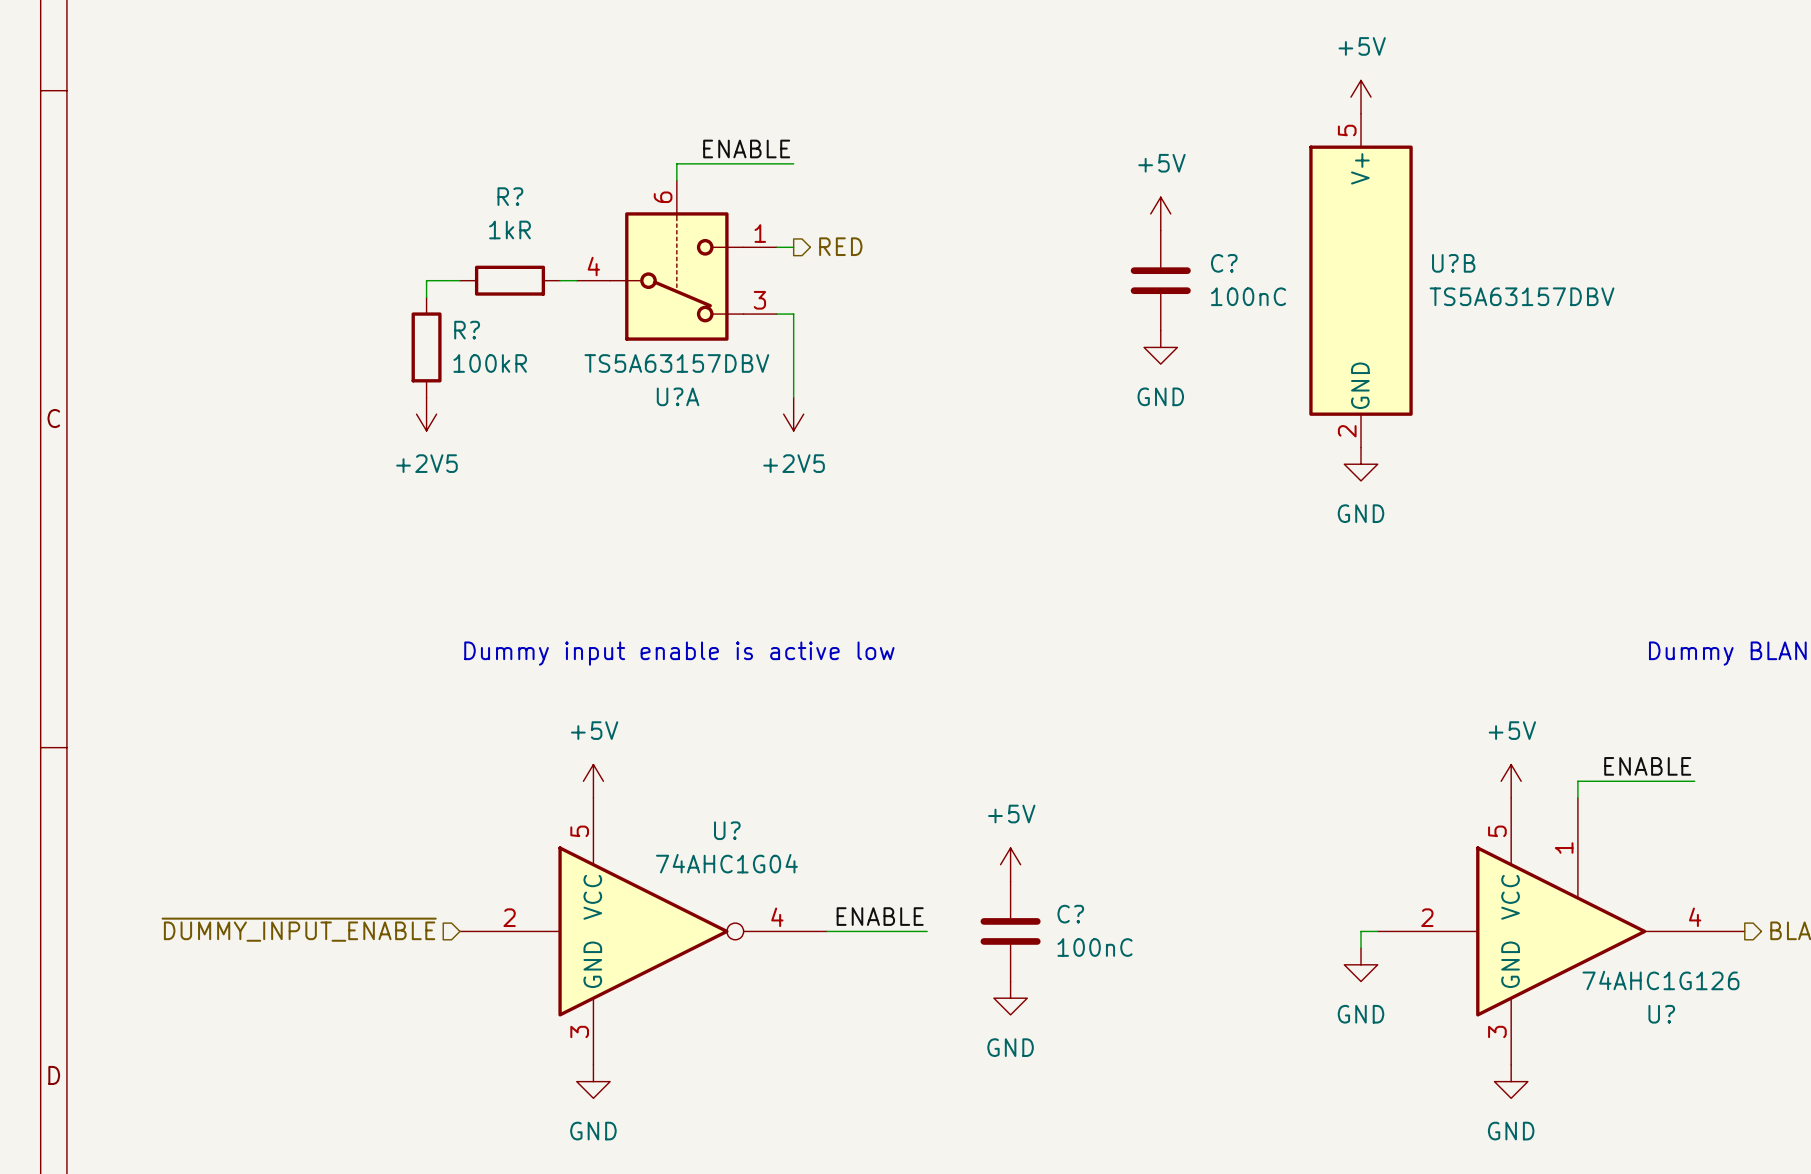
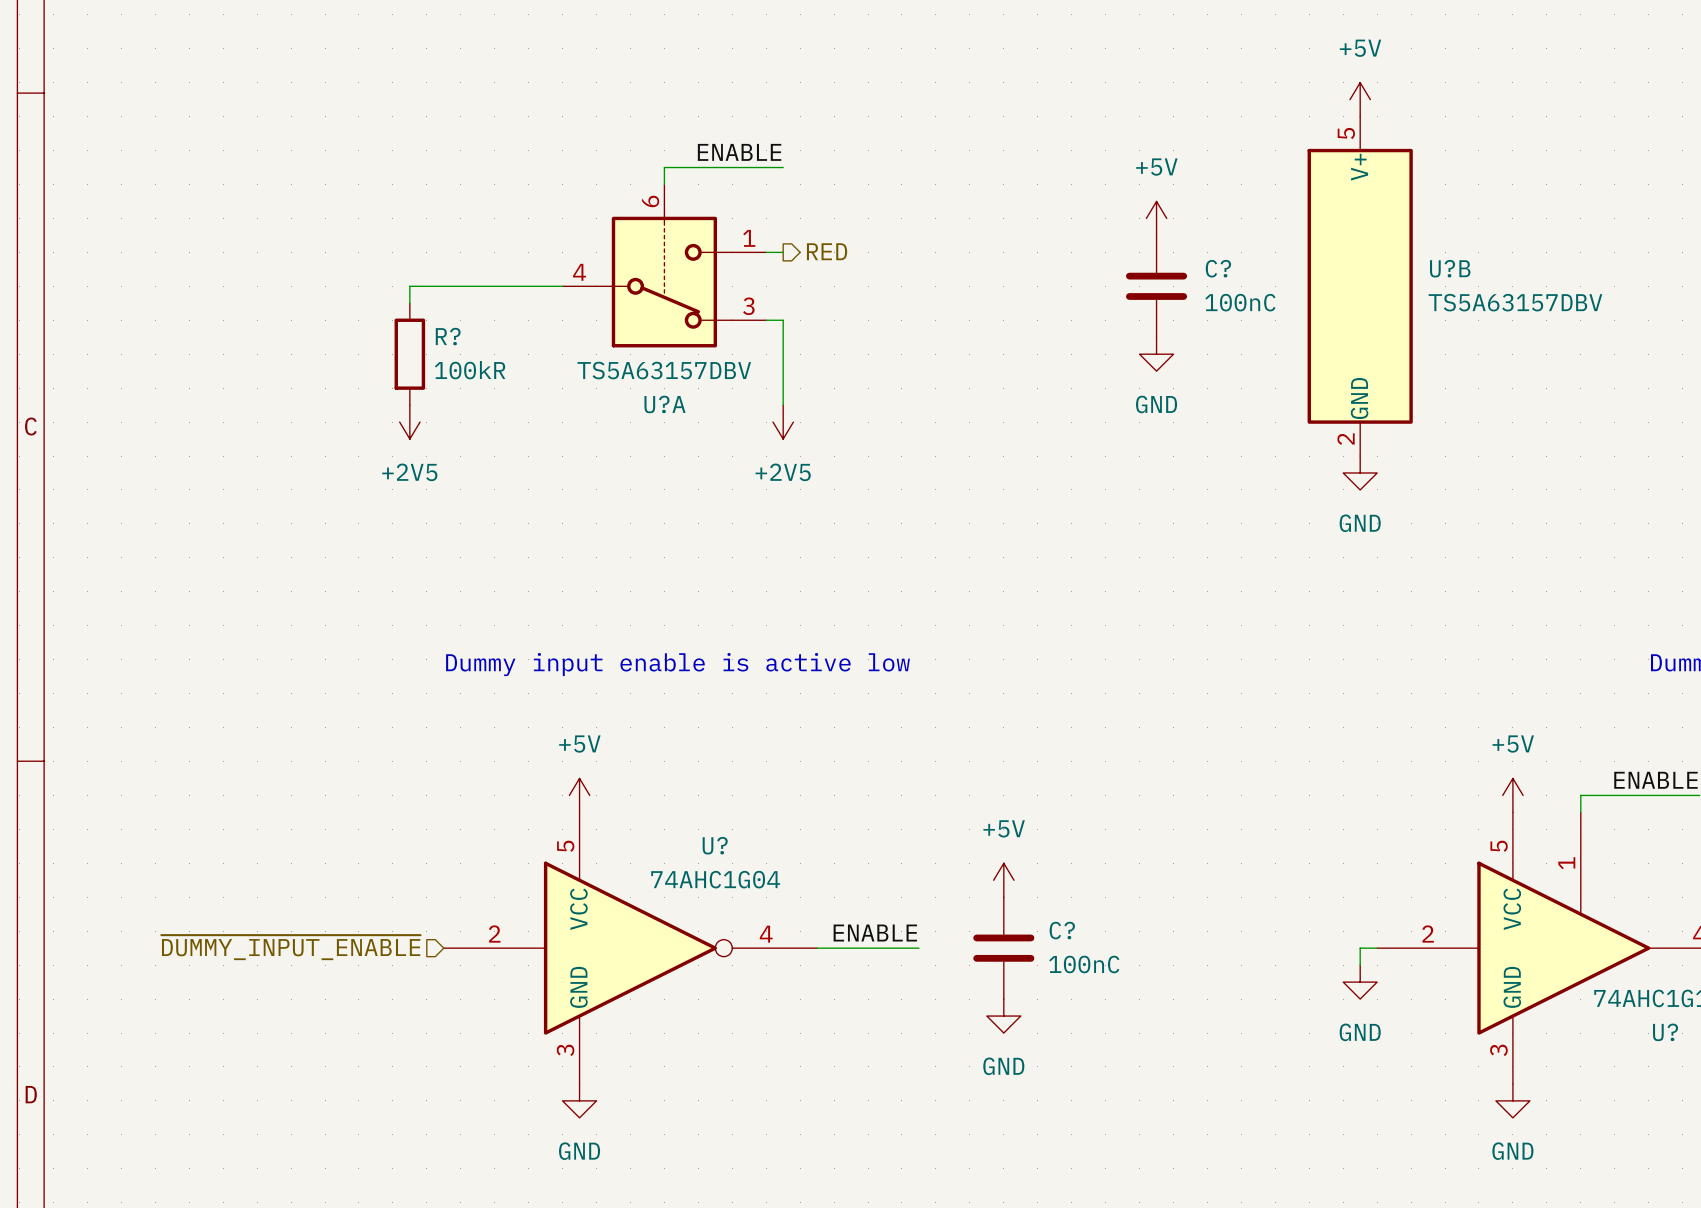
wire: none -> (443, 286) (545, 286)
R?: 1kR (509, 280) -> none

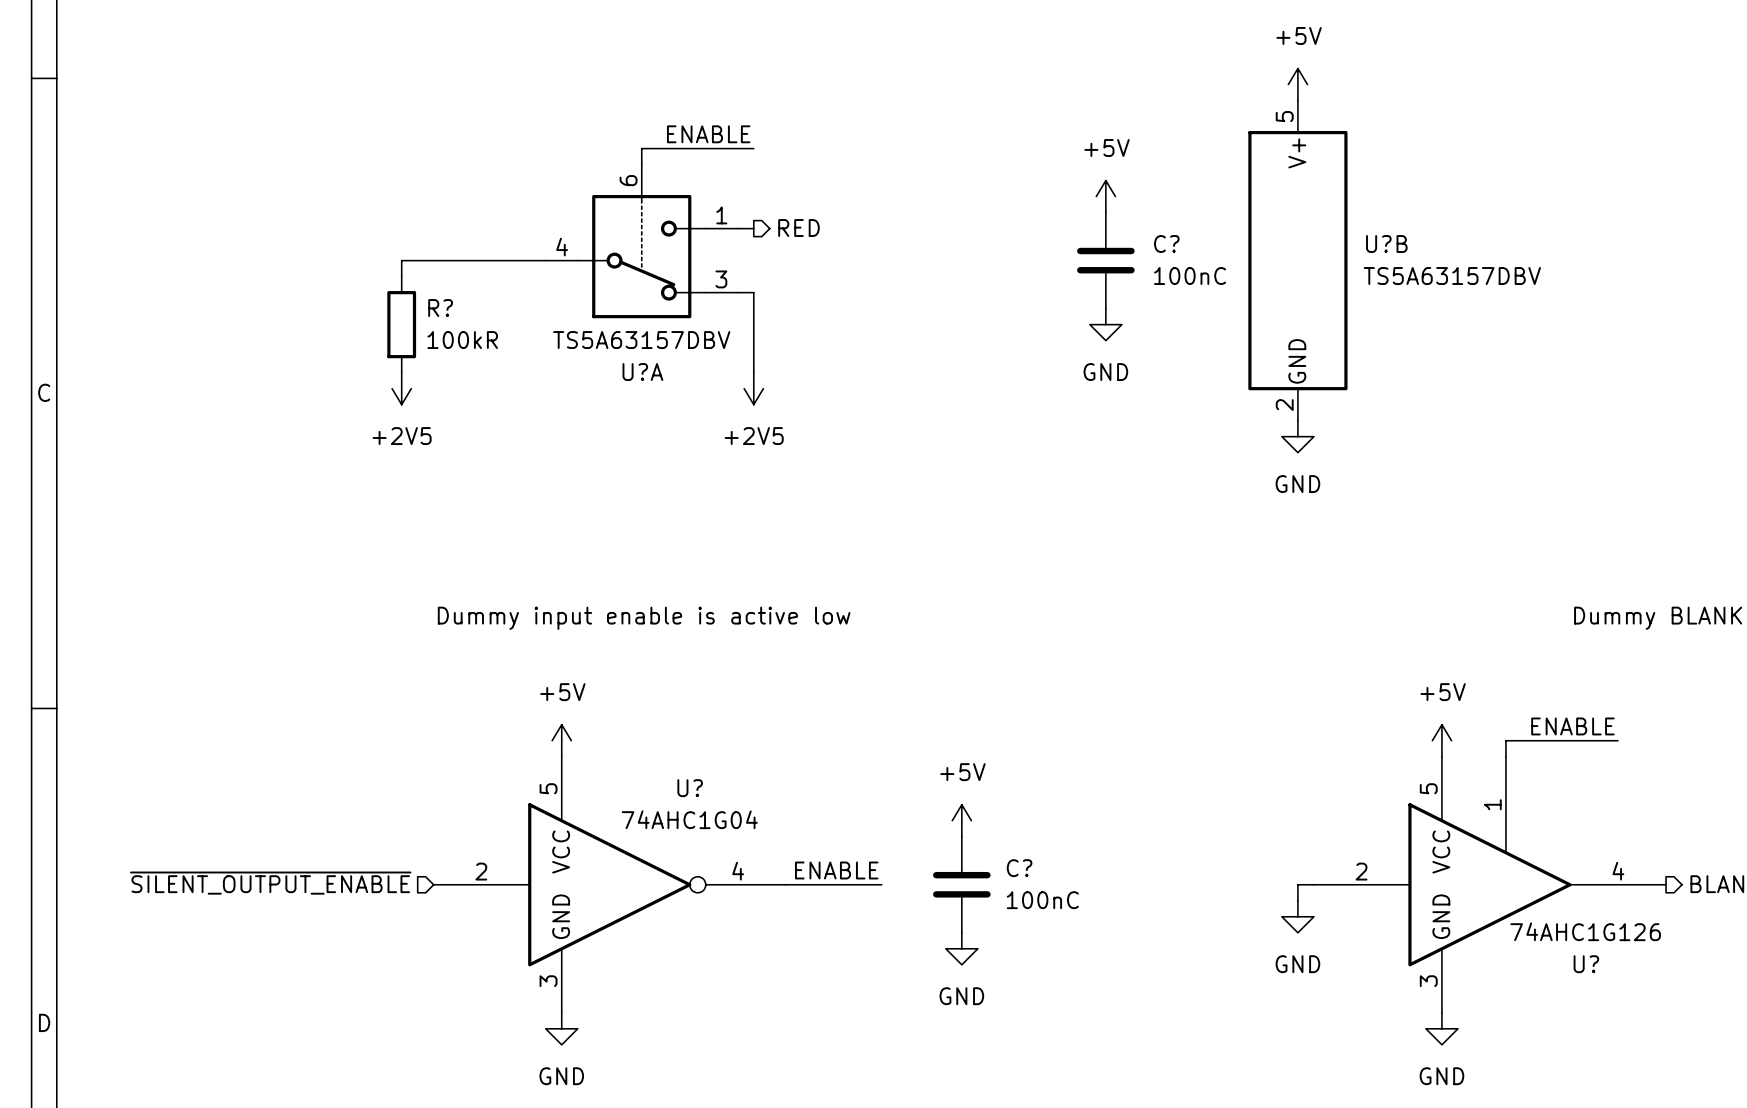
hierarchical label: ~{DUMMY_INPUT_ENABLE} (290, 947) -> ~{SILENT_OUTPUT_ENABLE} (270, 883)

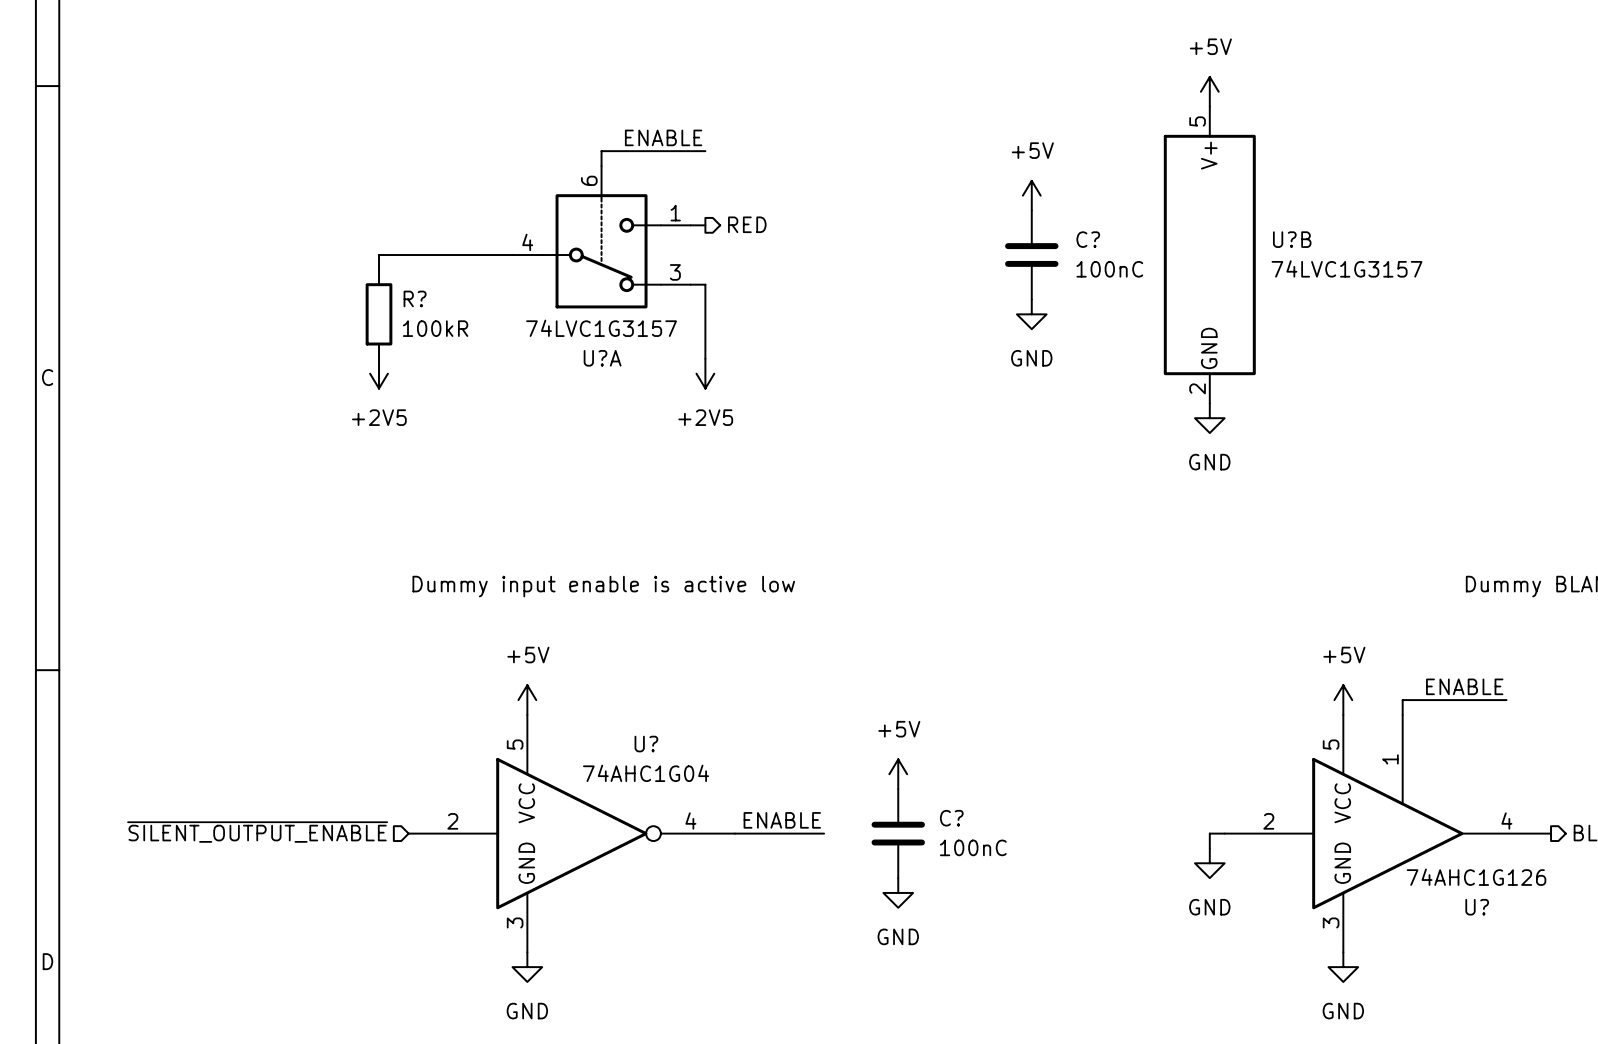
U?B value: TS5A63157DBV (1452, 276) -> 74LVC1G3157 (1346, 268)
U?A value: TS5A63157DBV (641, 340) -> 74LVC1G3157 (601, 328)

